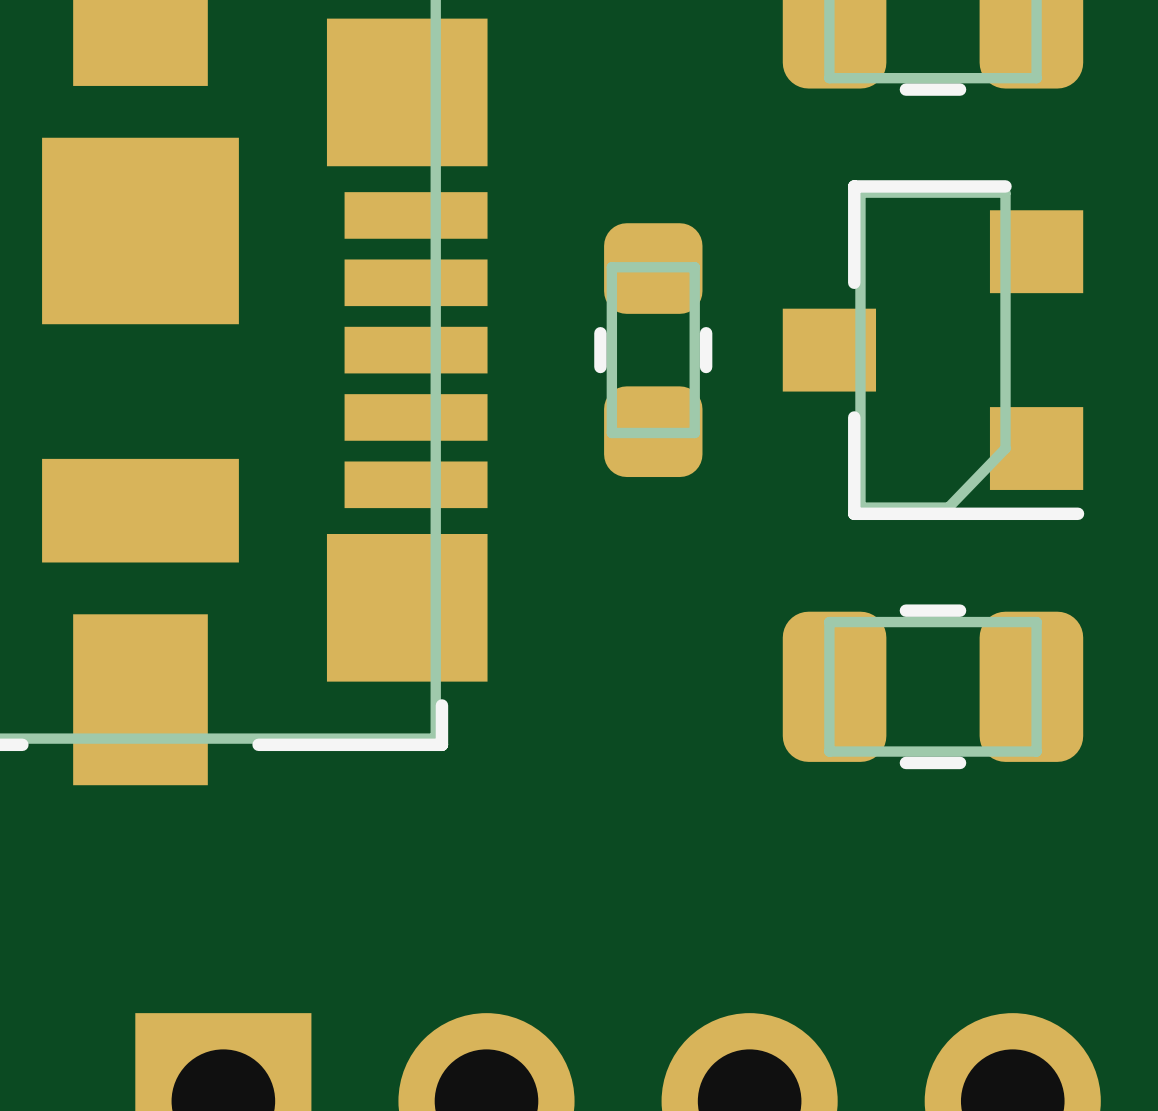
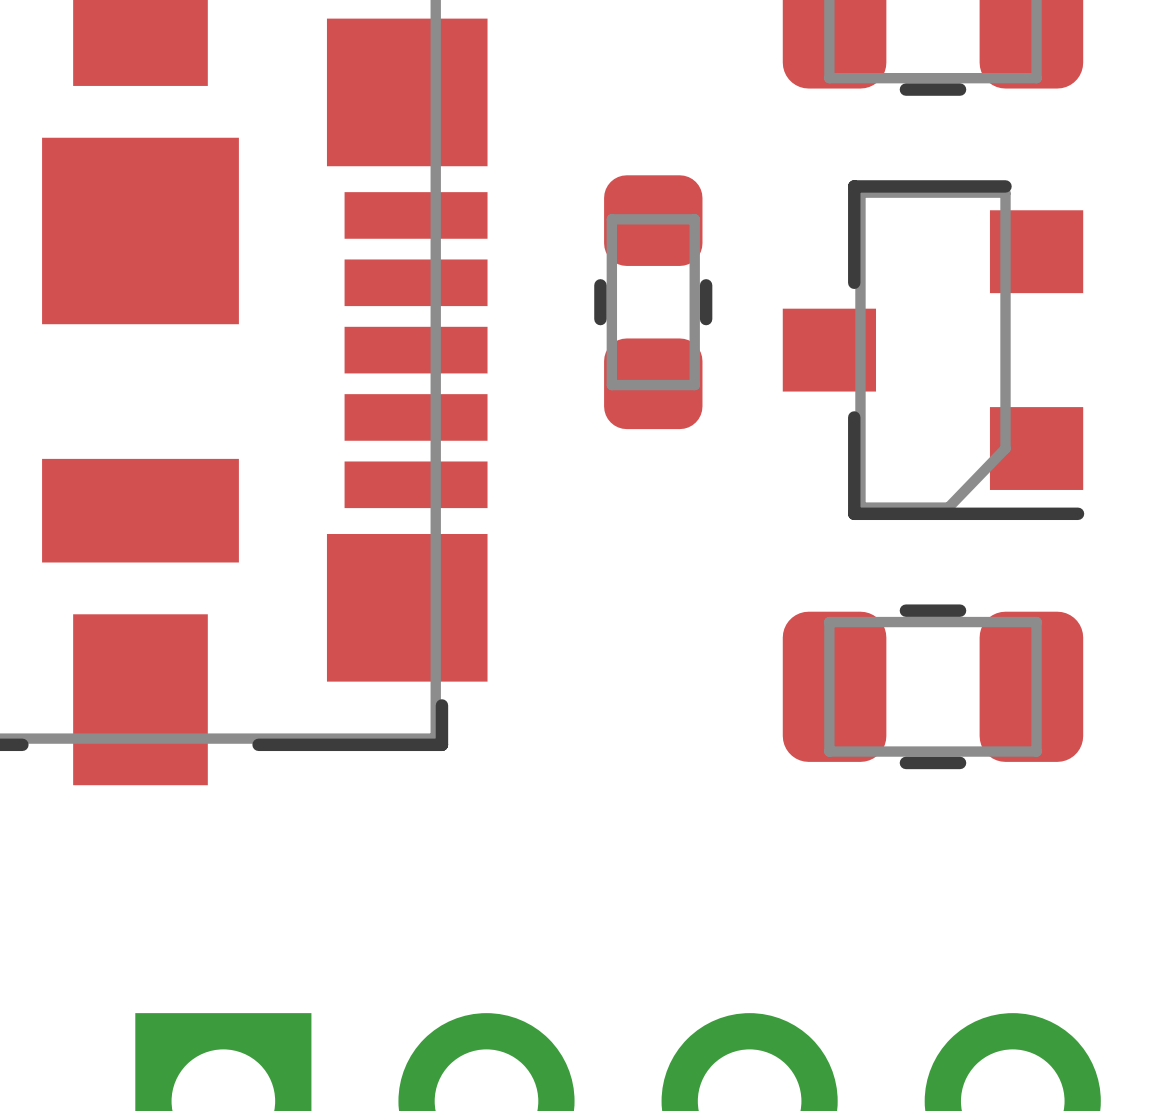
part position: (653, 350) -> (653, 302)

